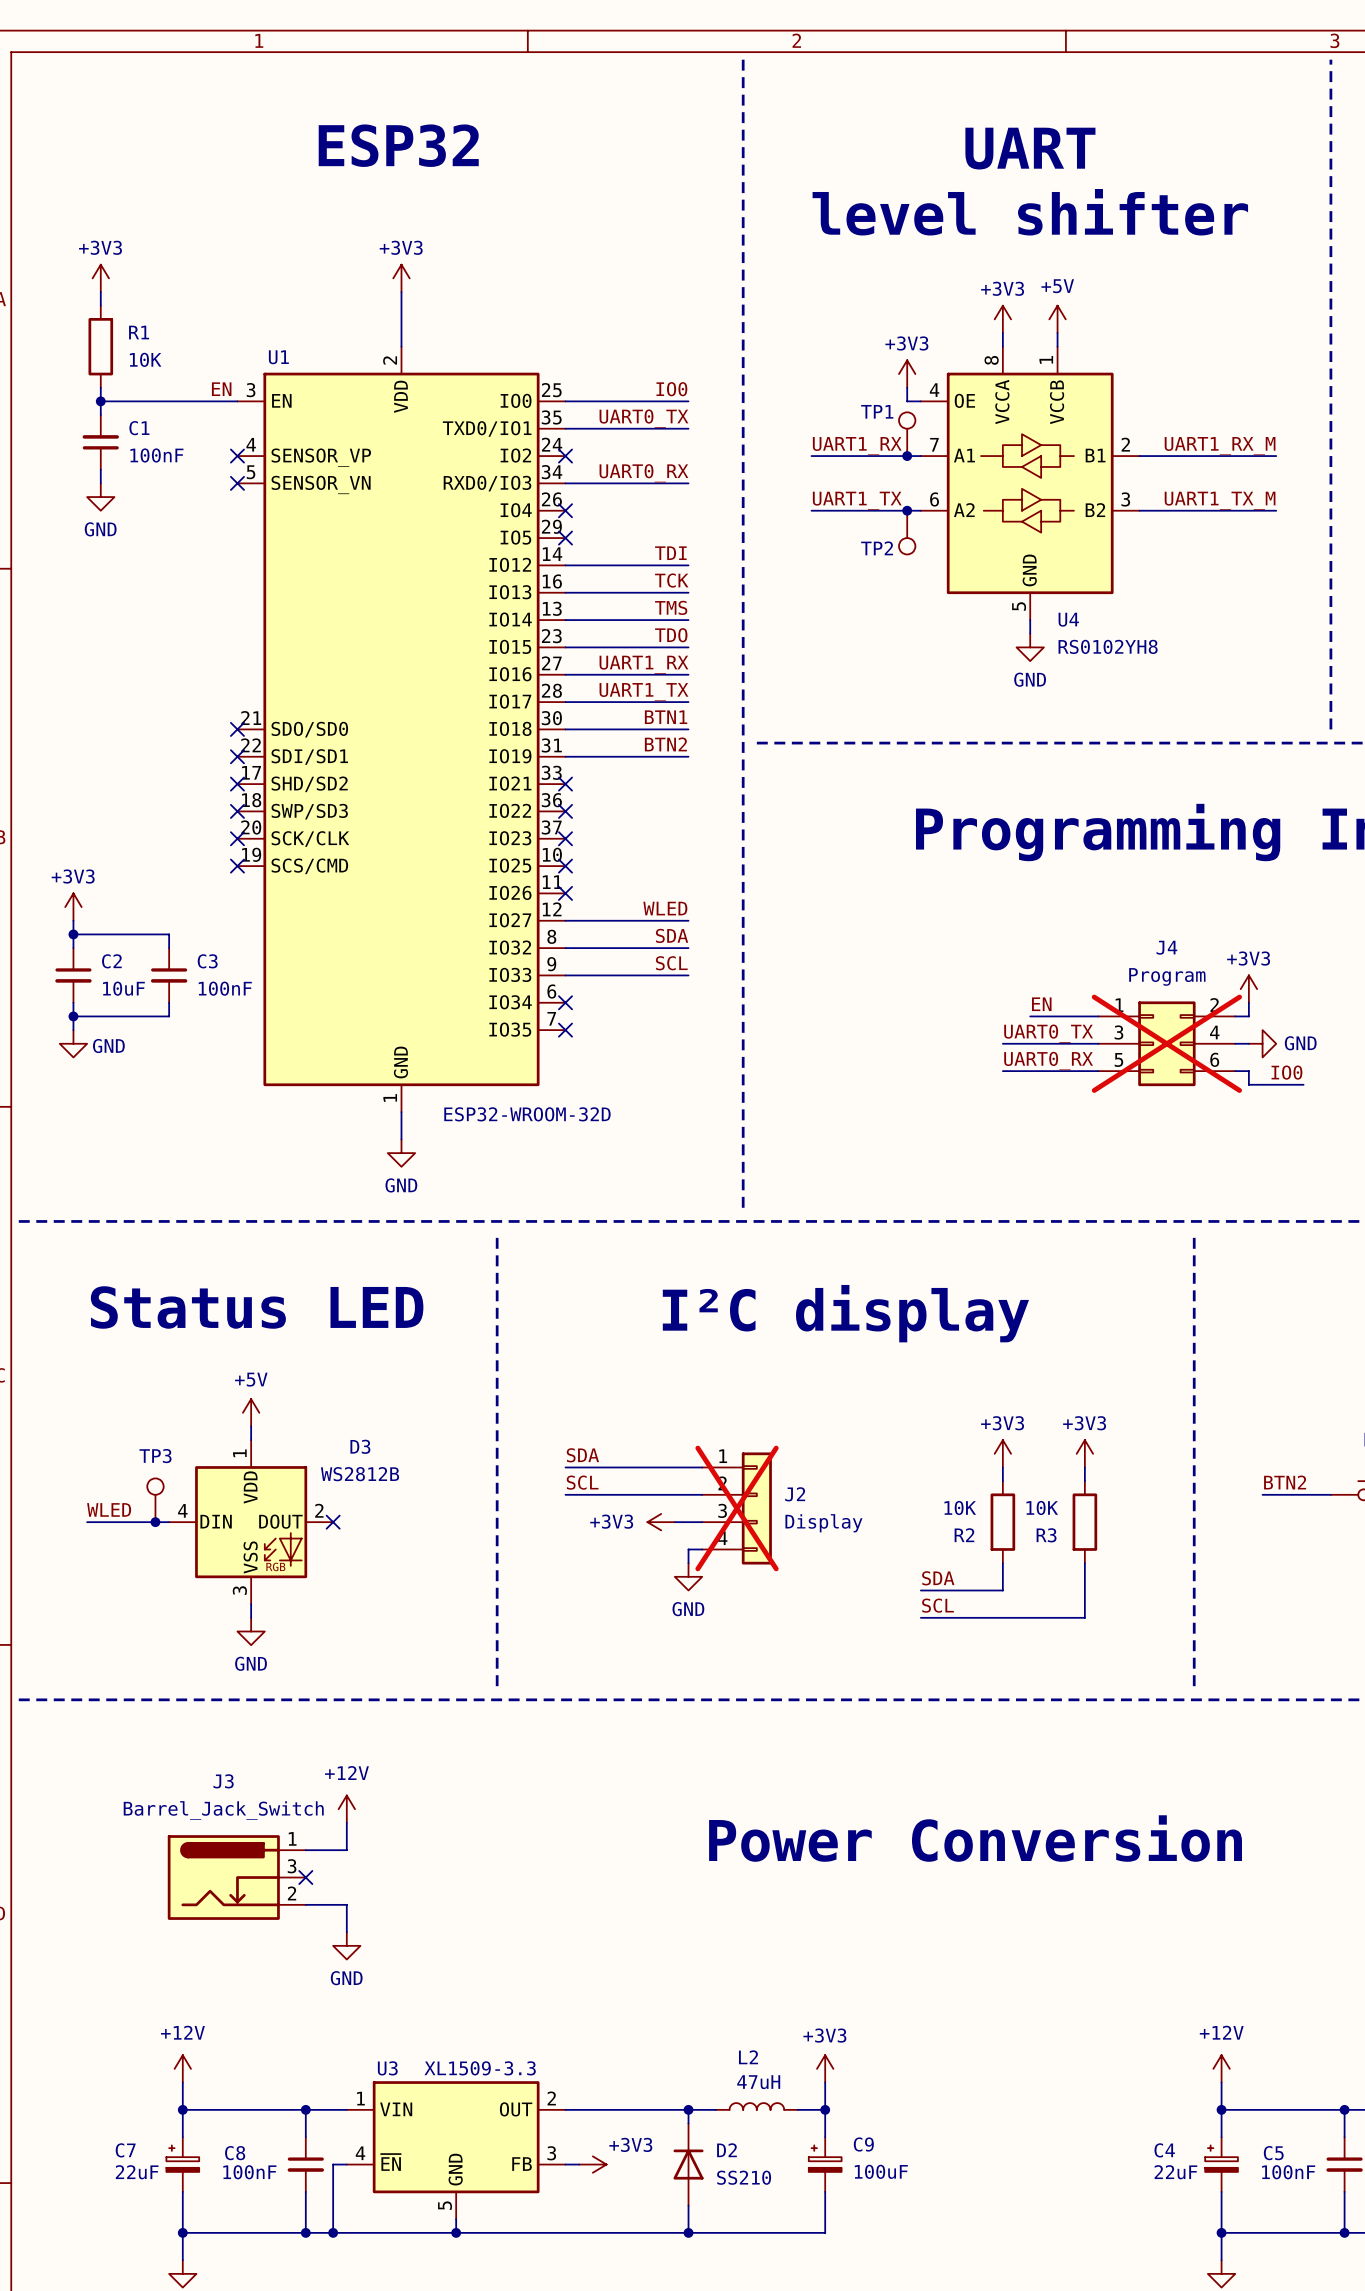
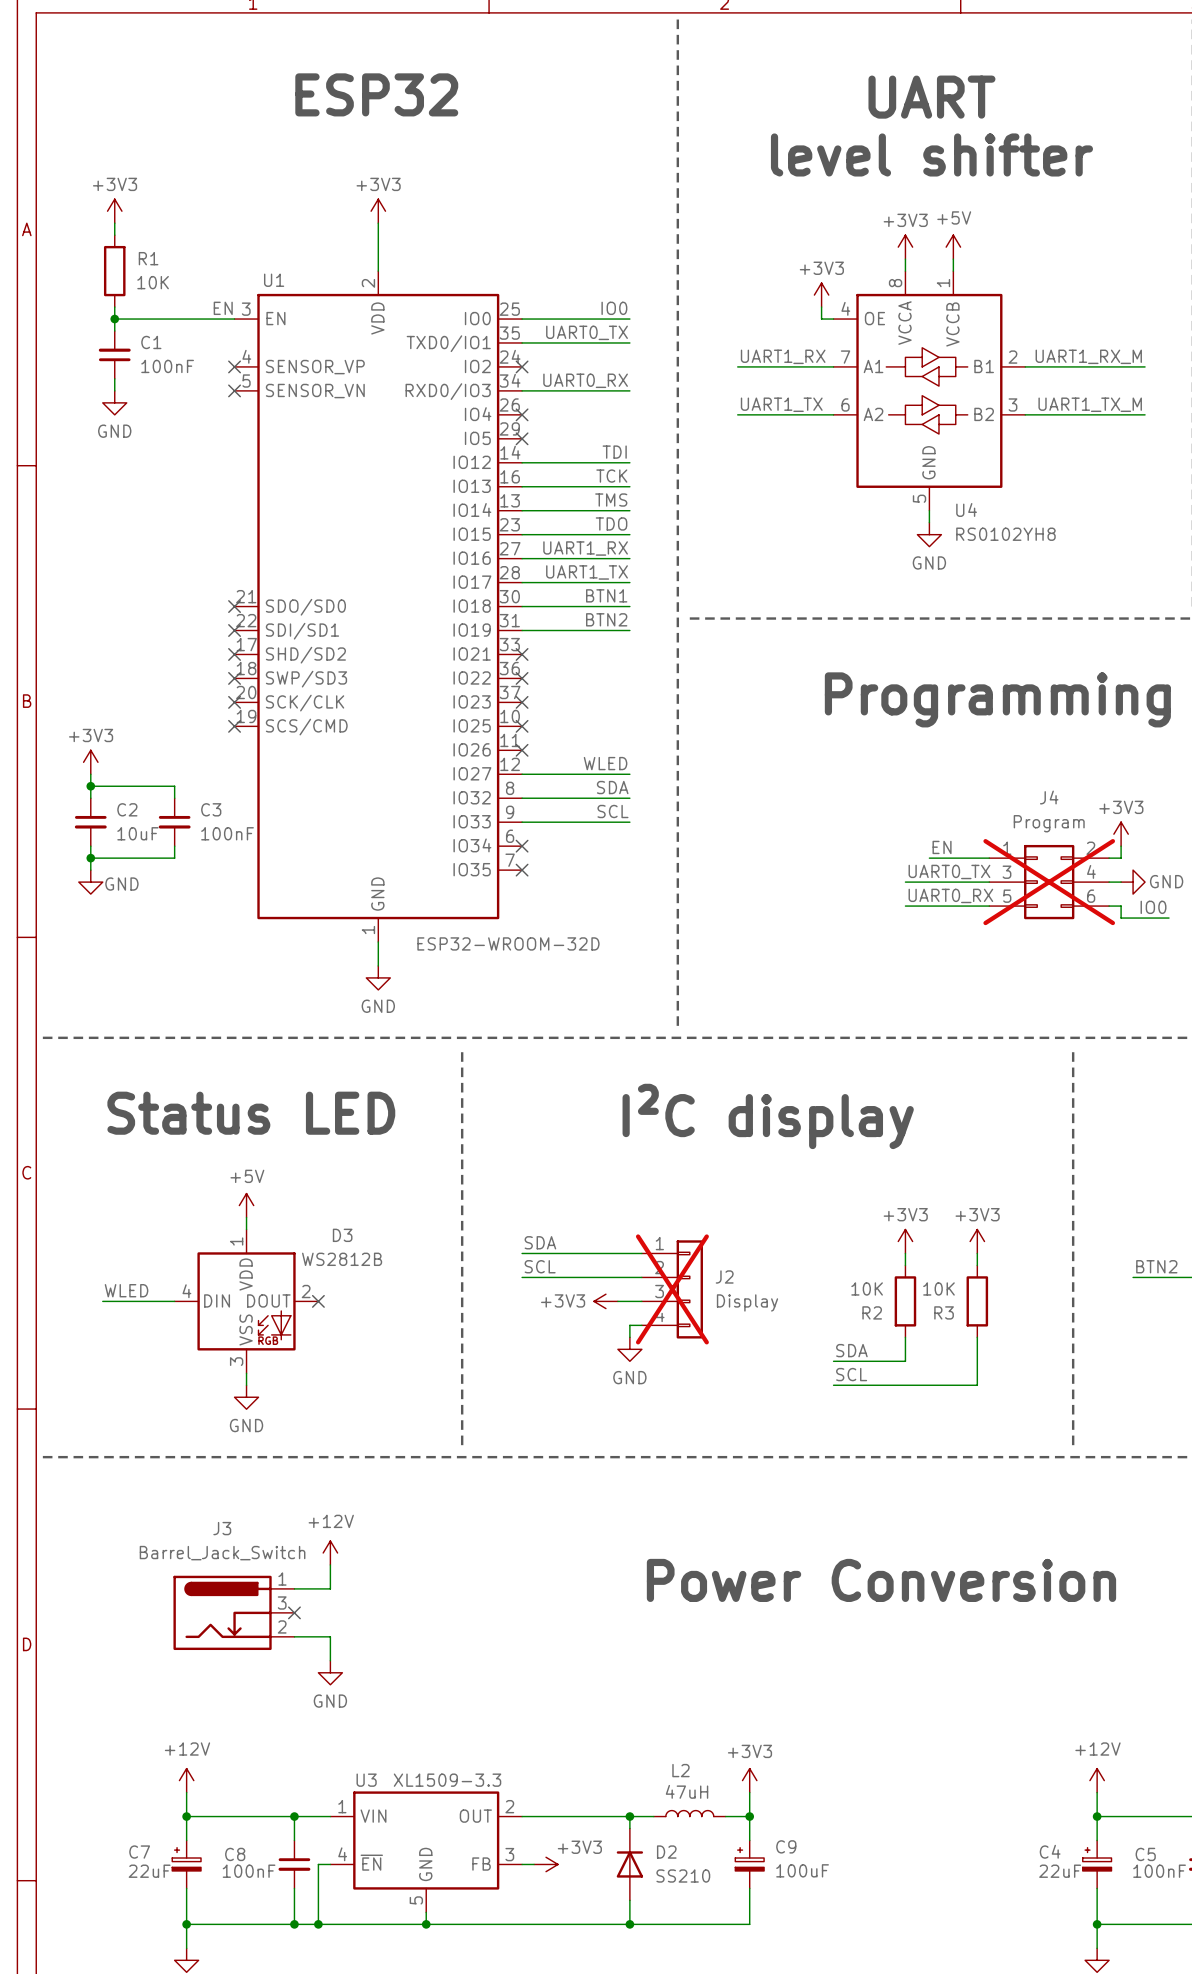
TP1: (907, 434) -> none
junction: (907, 456) -> none
junction: (907, 510) -> none
TP2: (907, 532) -> none
TP3: (155, 1500) -> none
junction: (155, 1522) -> none

